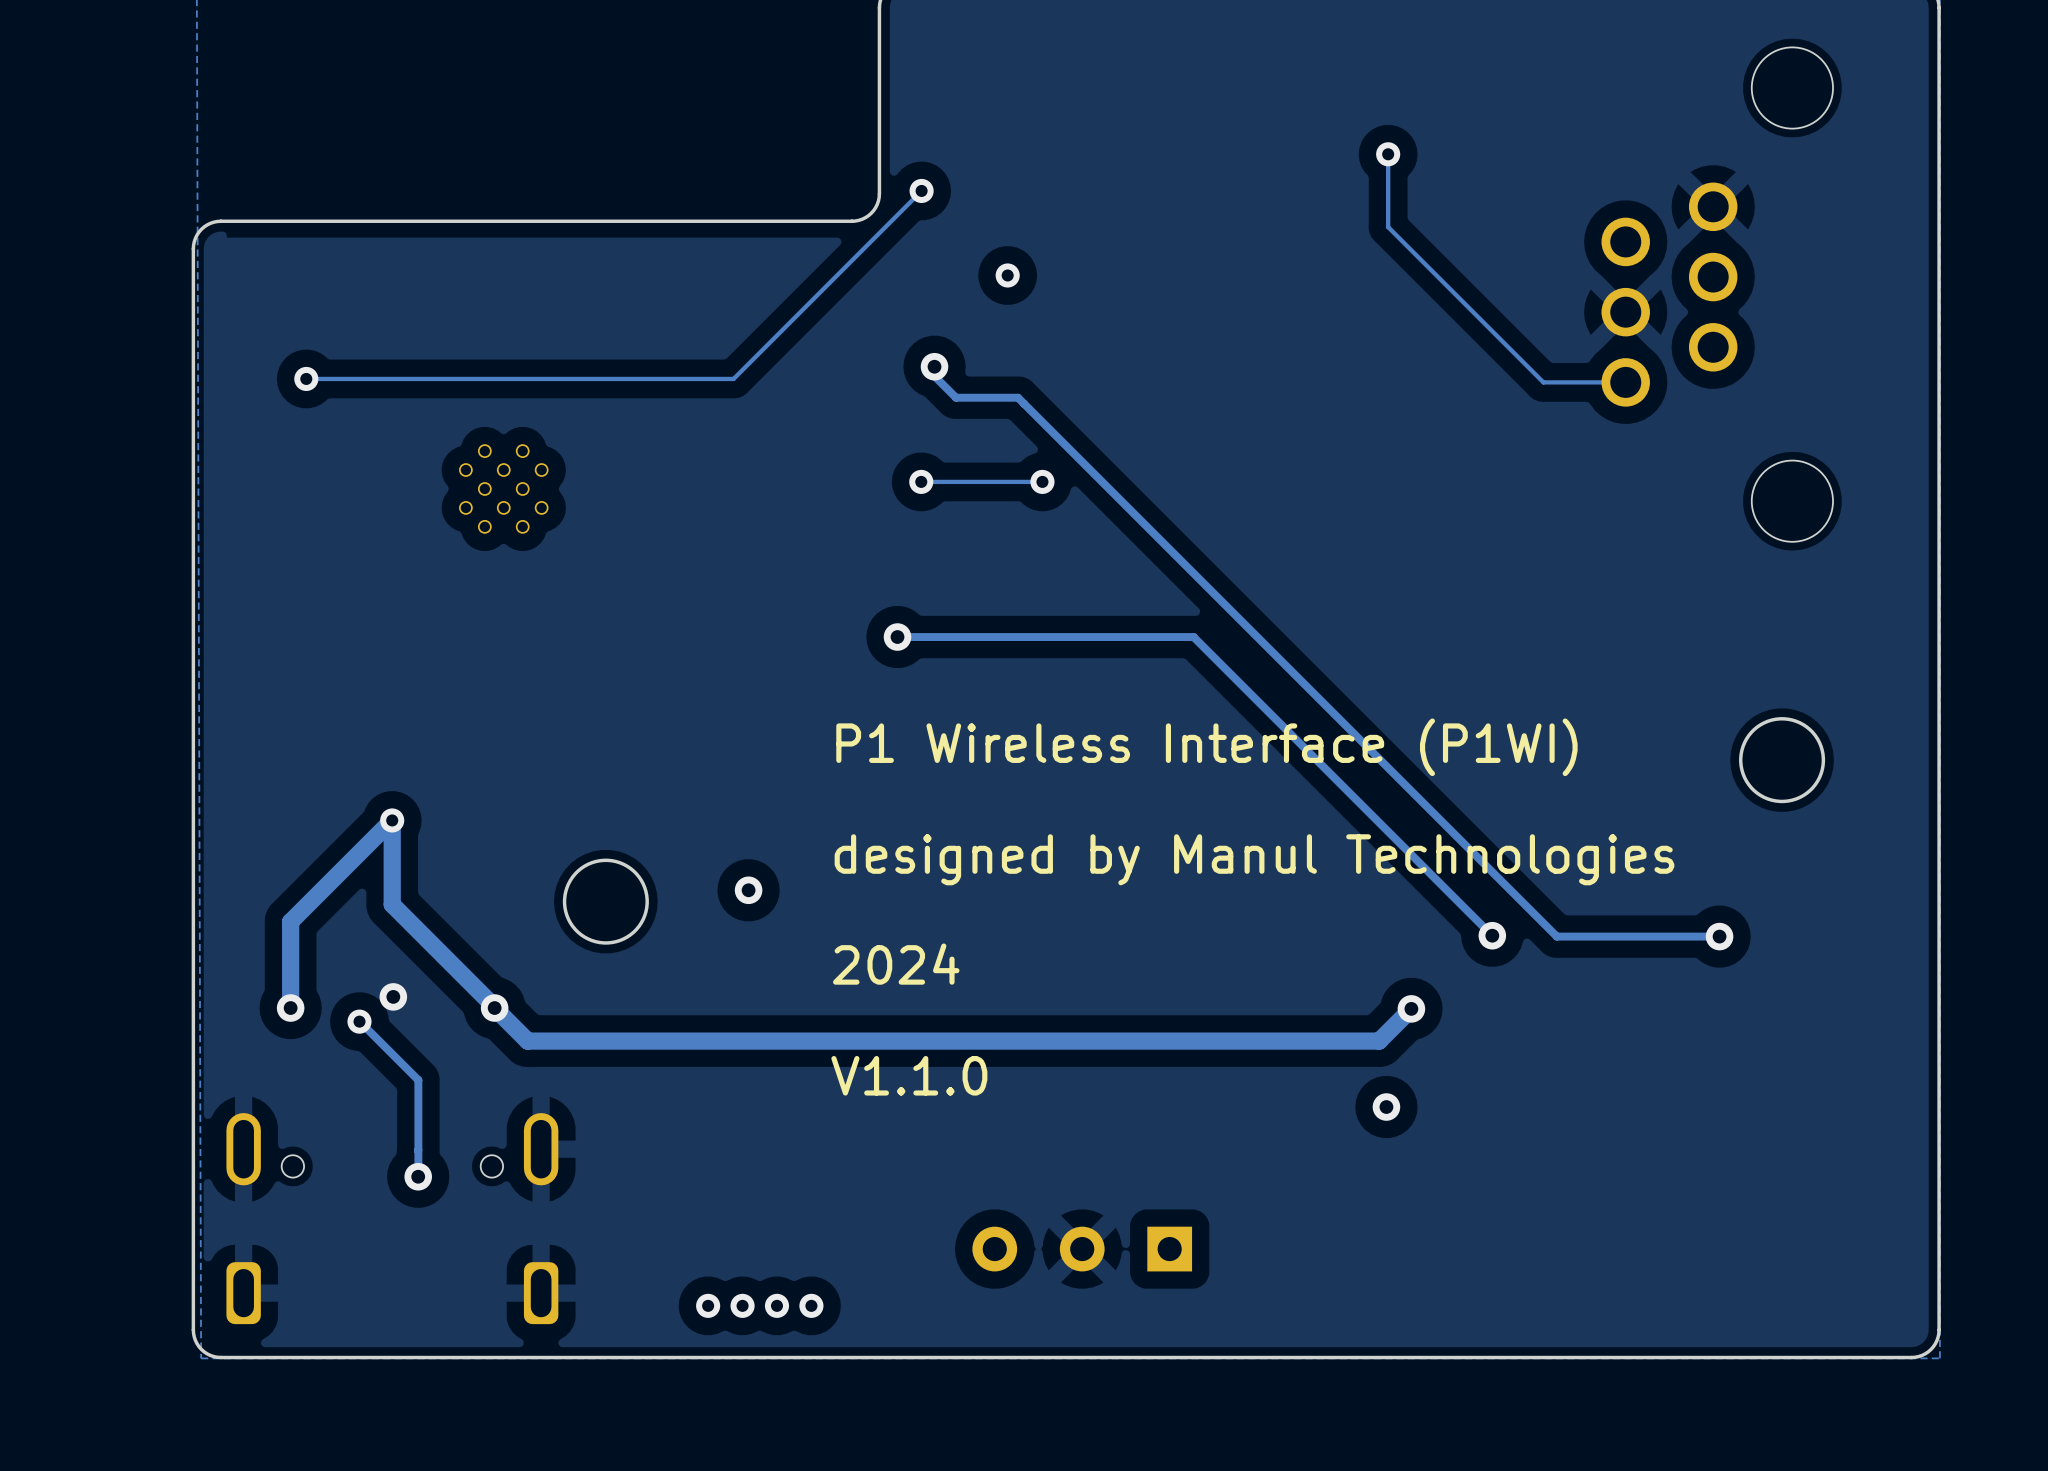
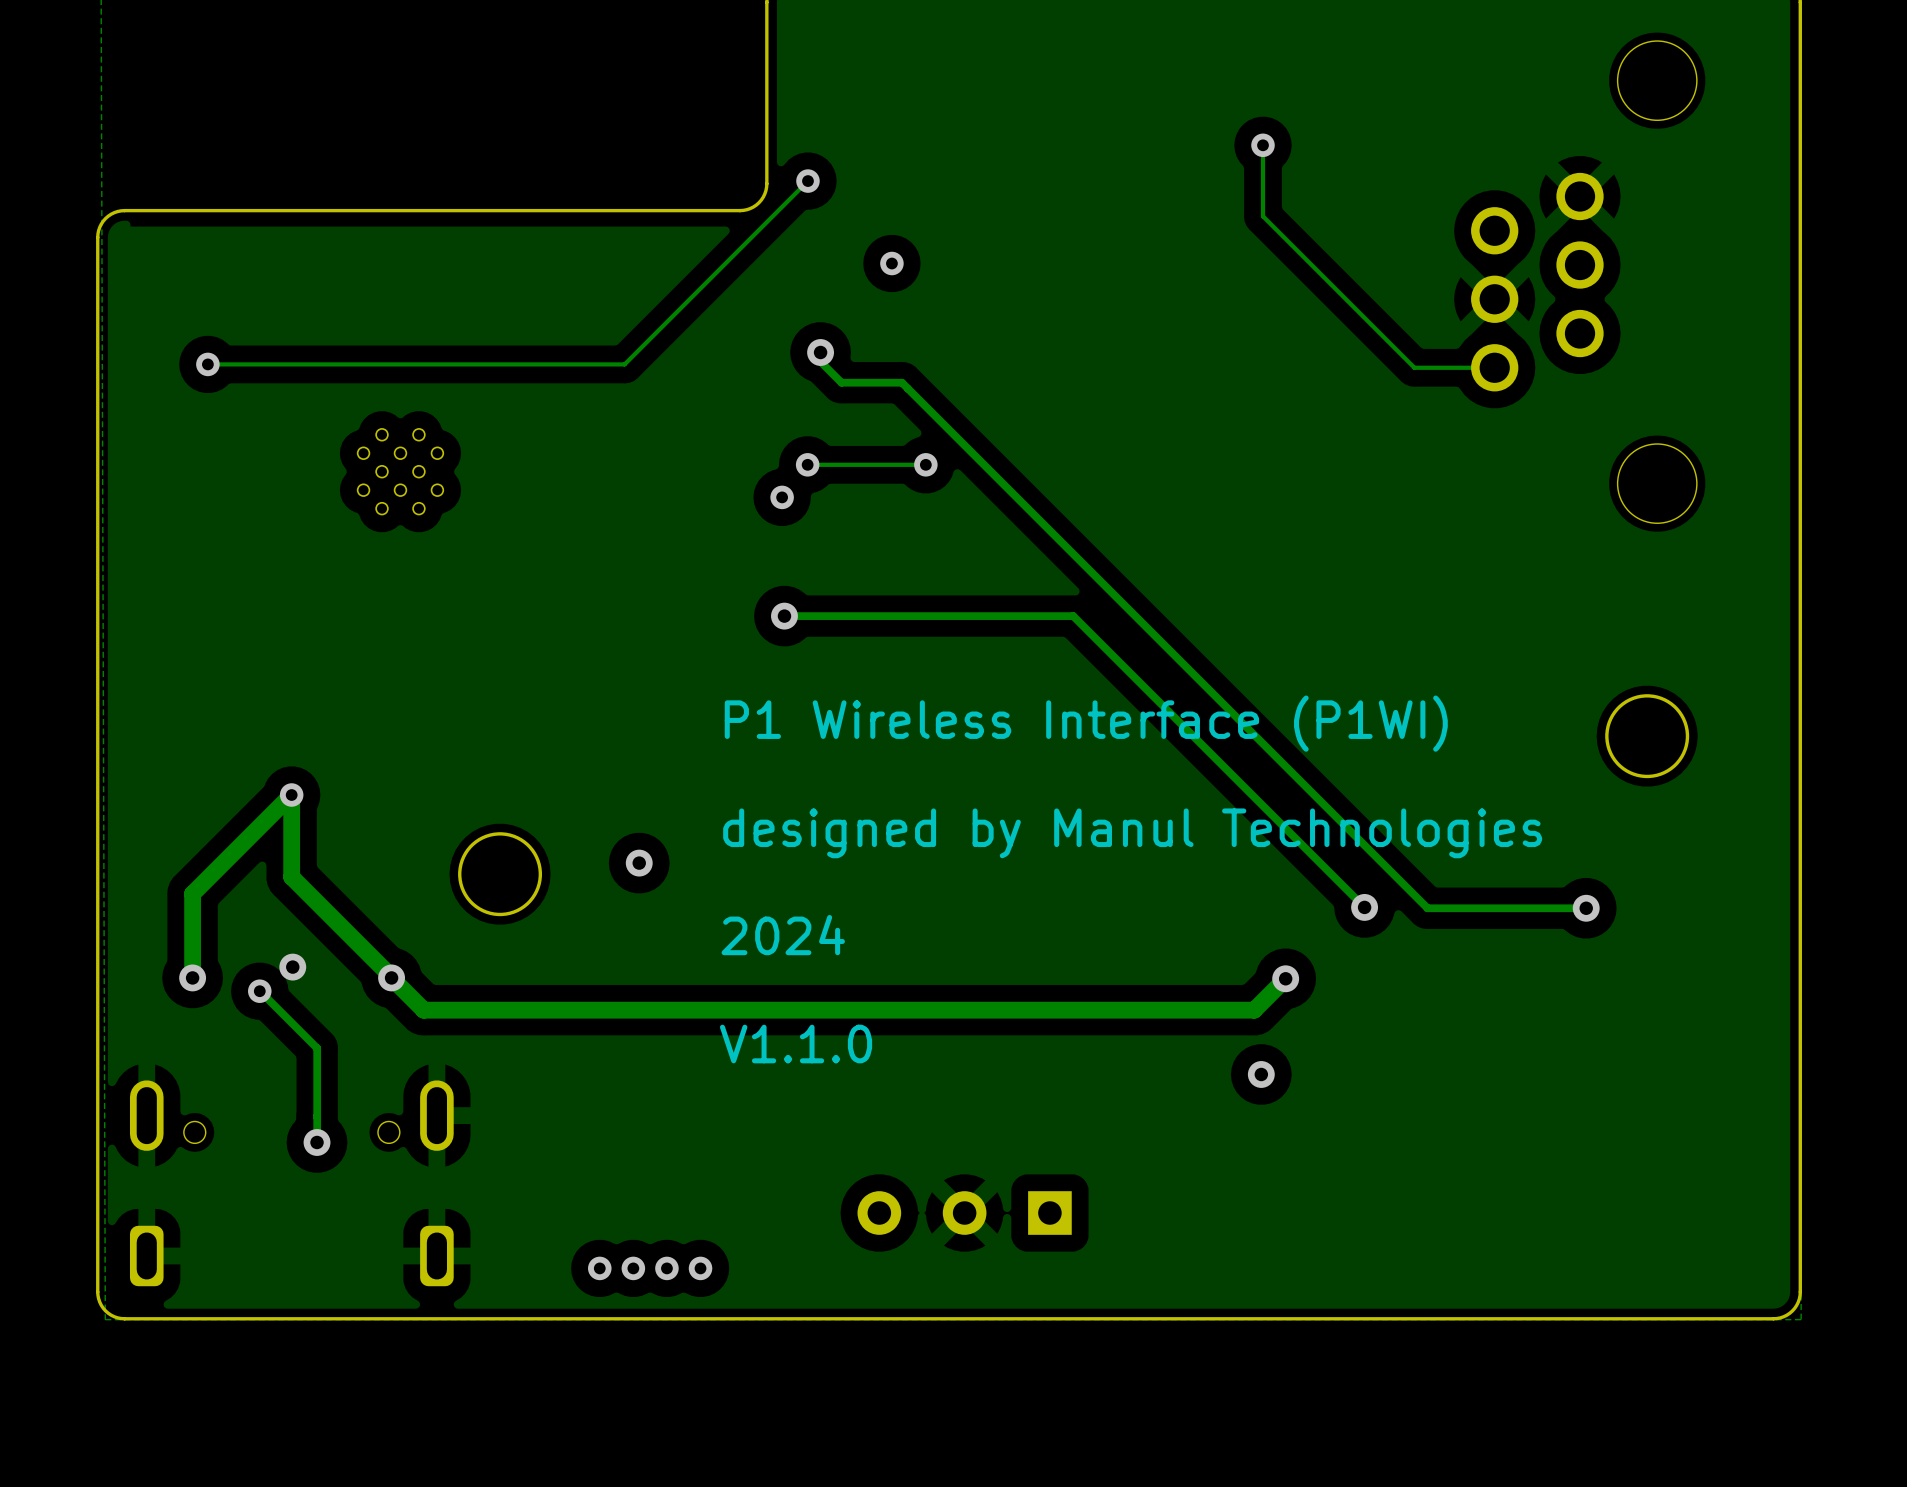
via: none -> (782, 497)

